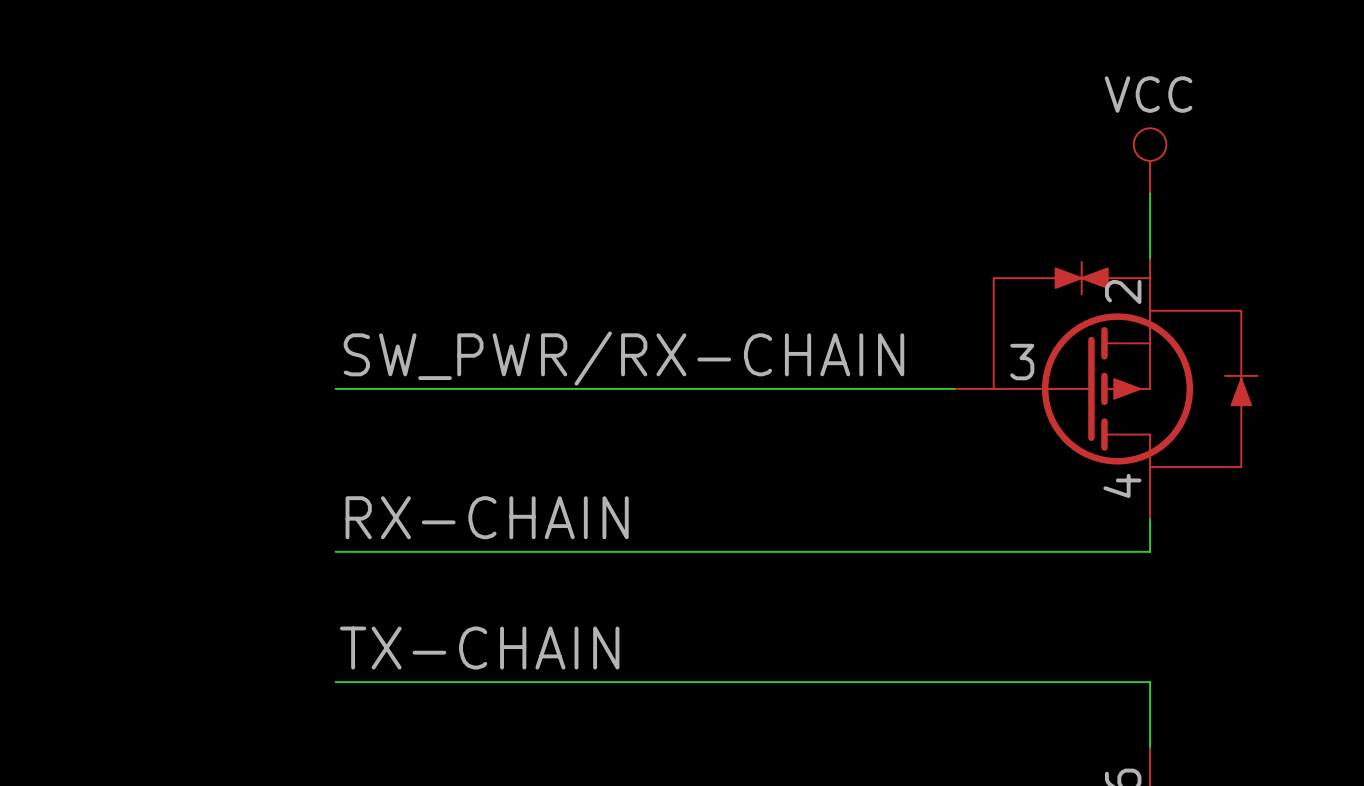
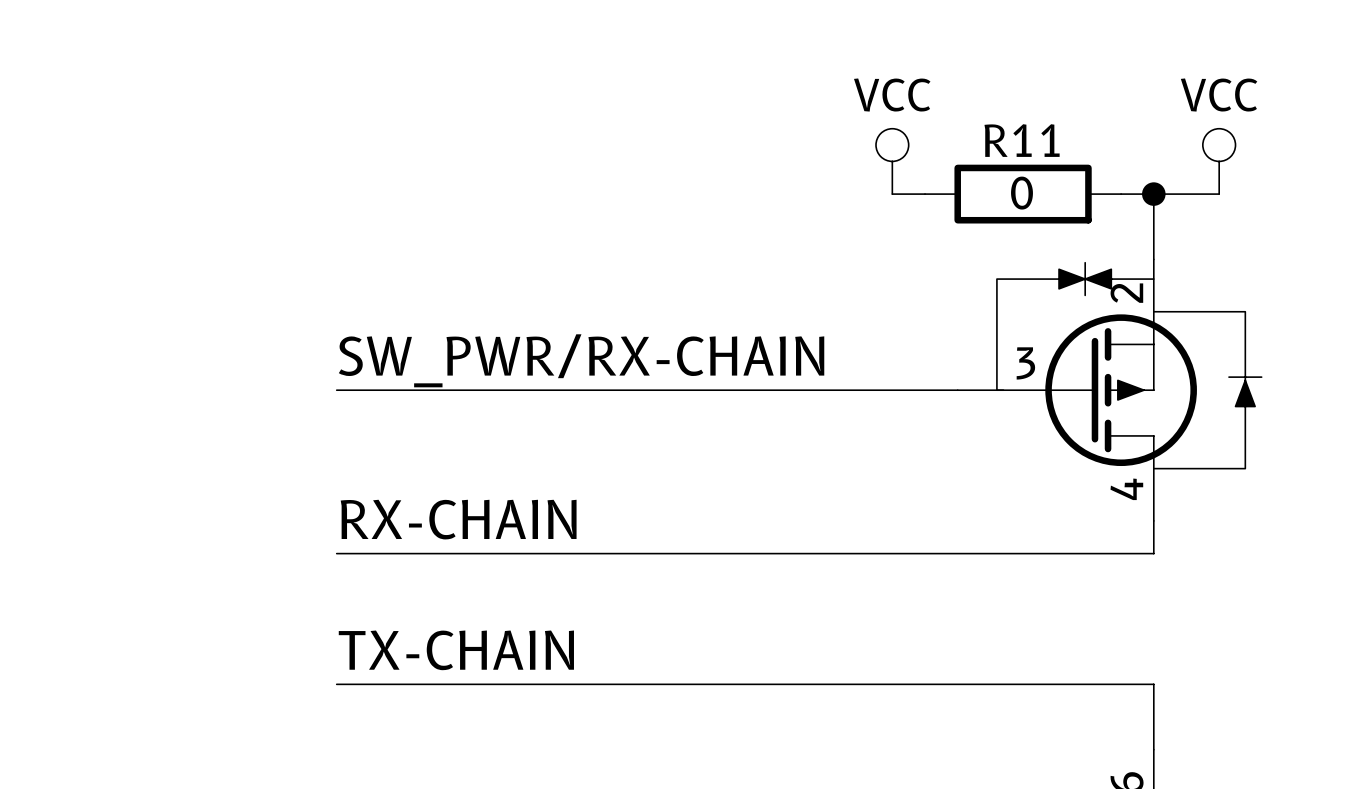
power symbol: none -> VCC (892, 161)
power symbol position: VCC (1150, 160) -> VCC (1219, 161)
wire: none -> (892, 194) (925, 194)
R11: none -> 0 (1023, 194)
wire: none -> (1121, 194) (1219, 194)
junction: none -> (1153, 194)

